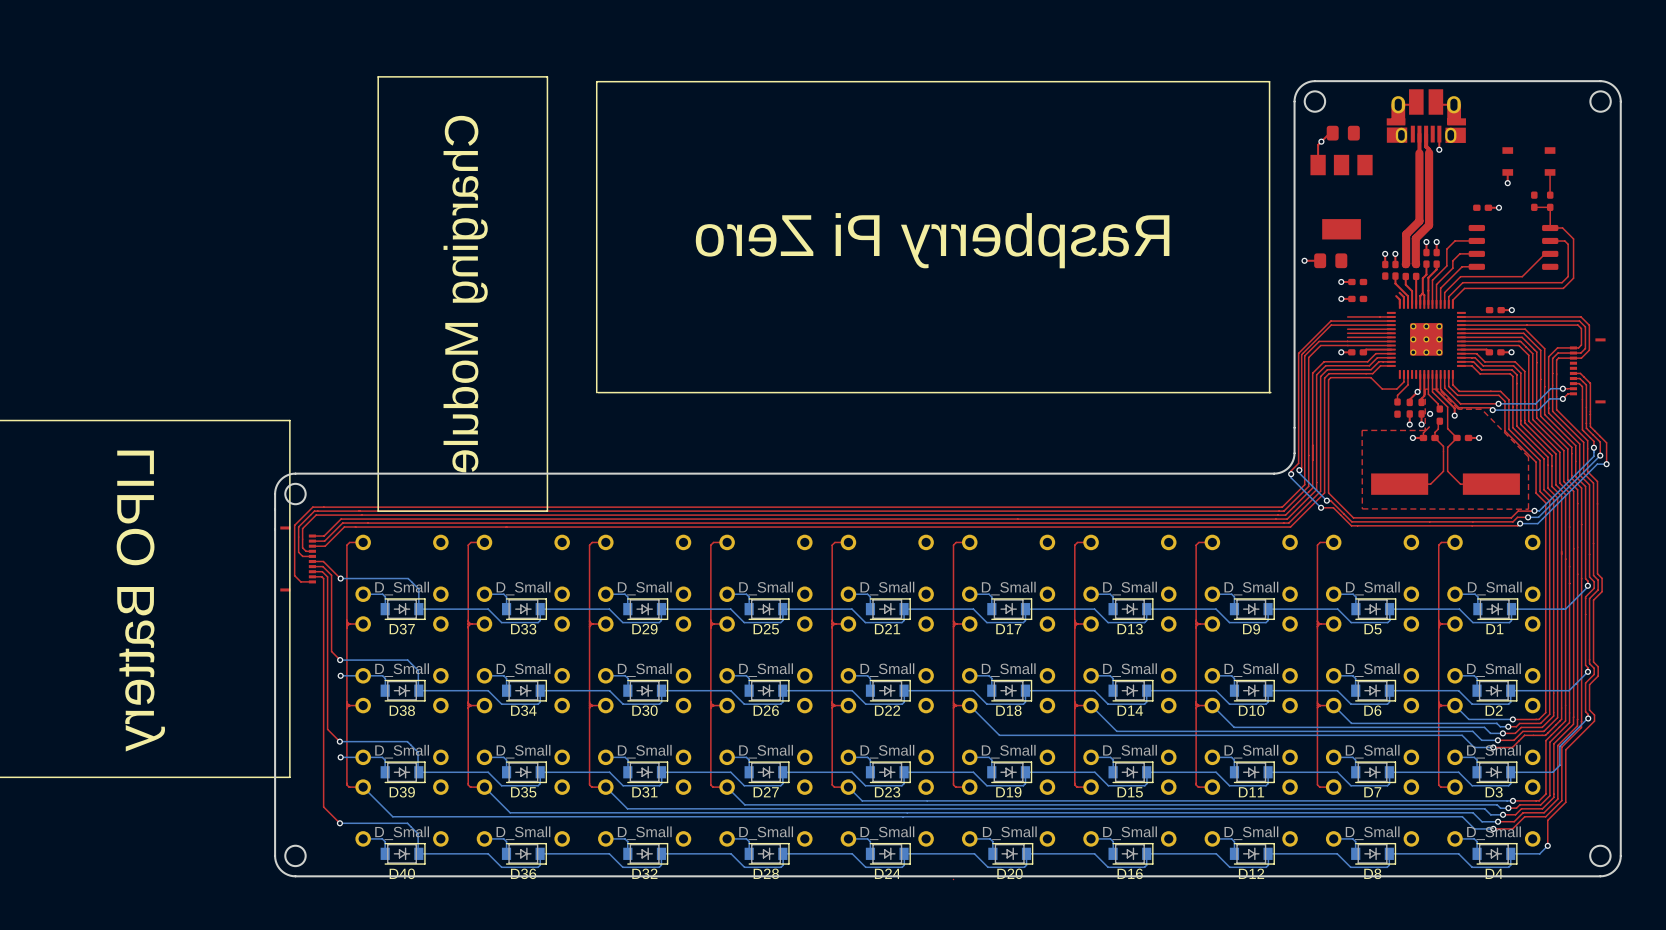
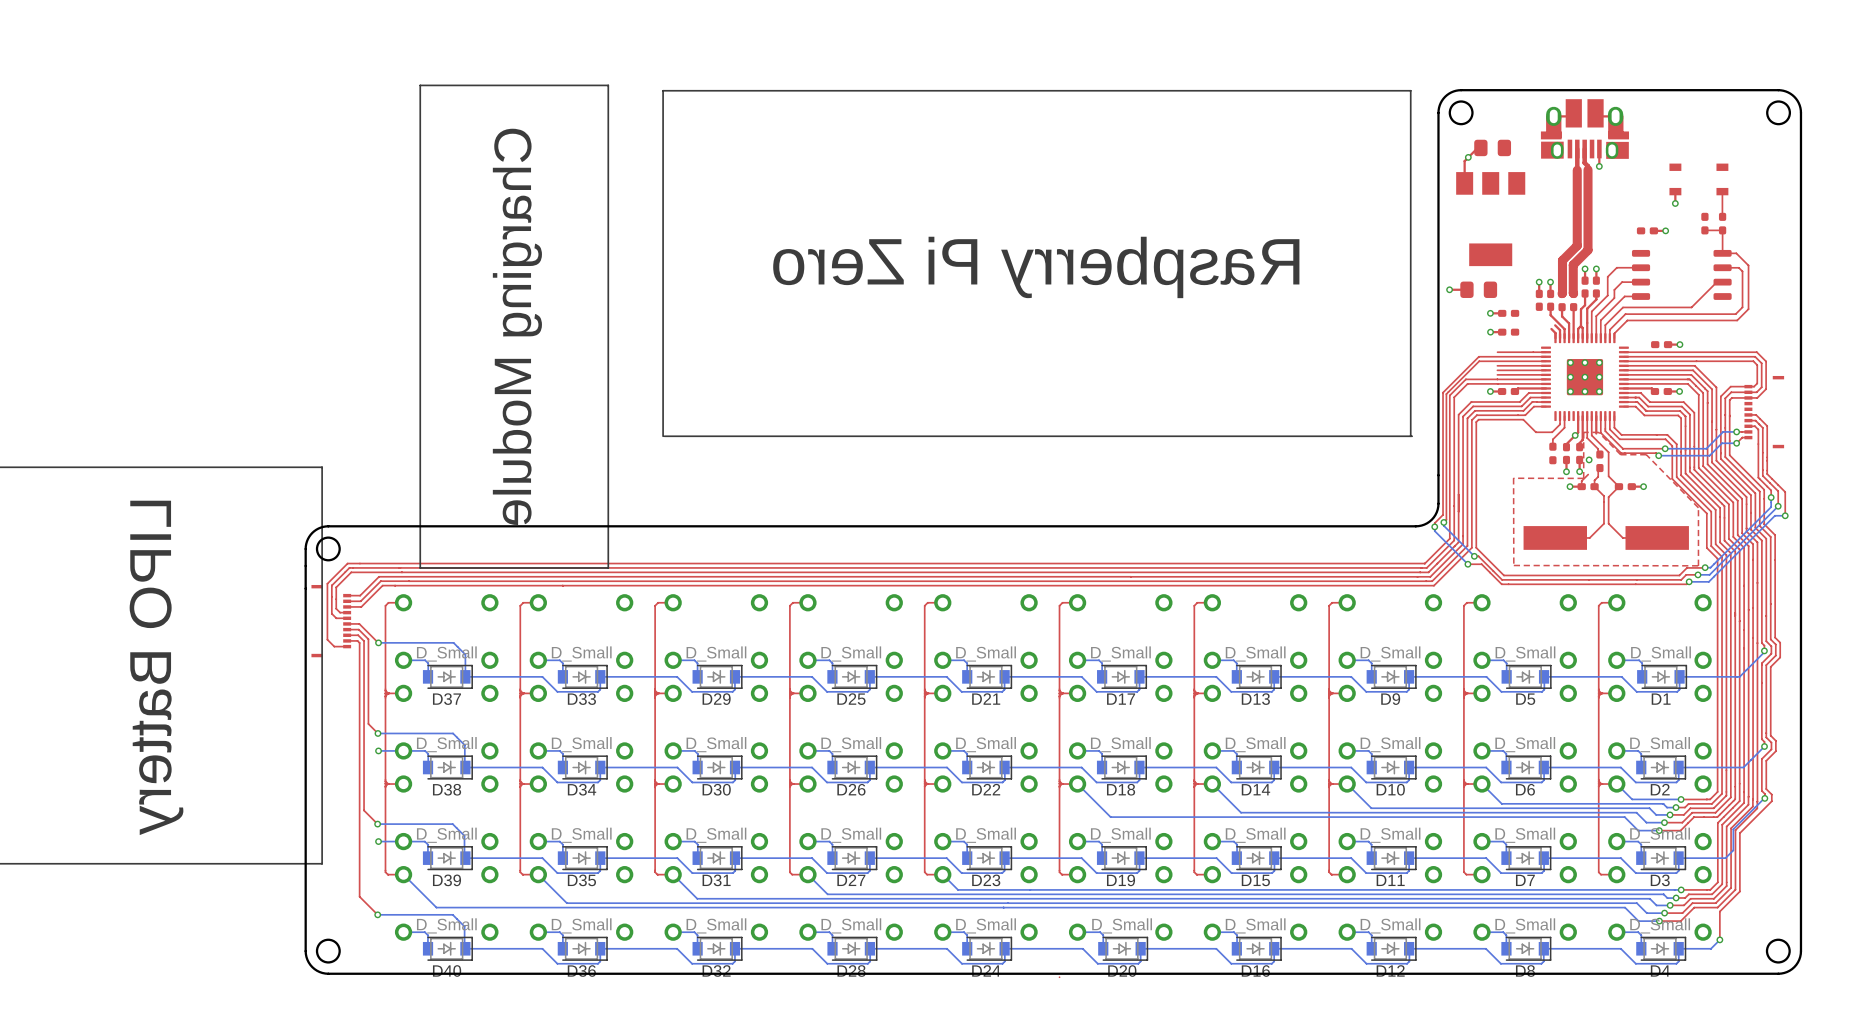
top track: (1436, 390) (1454, 408) (1454, 415) -> none
via: (1454, 415) -> none

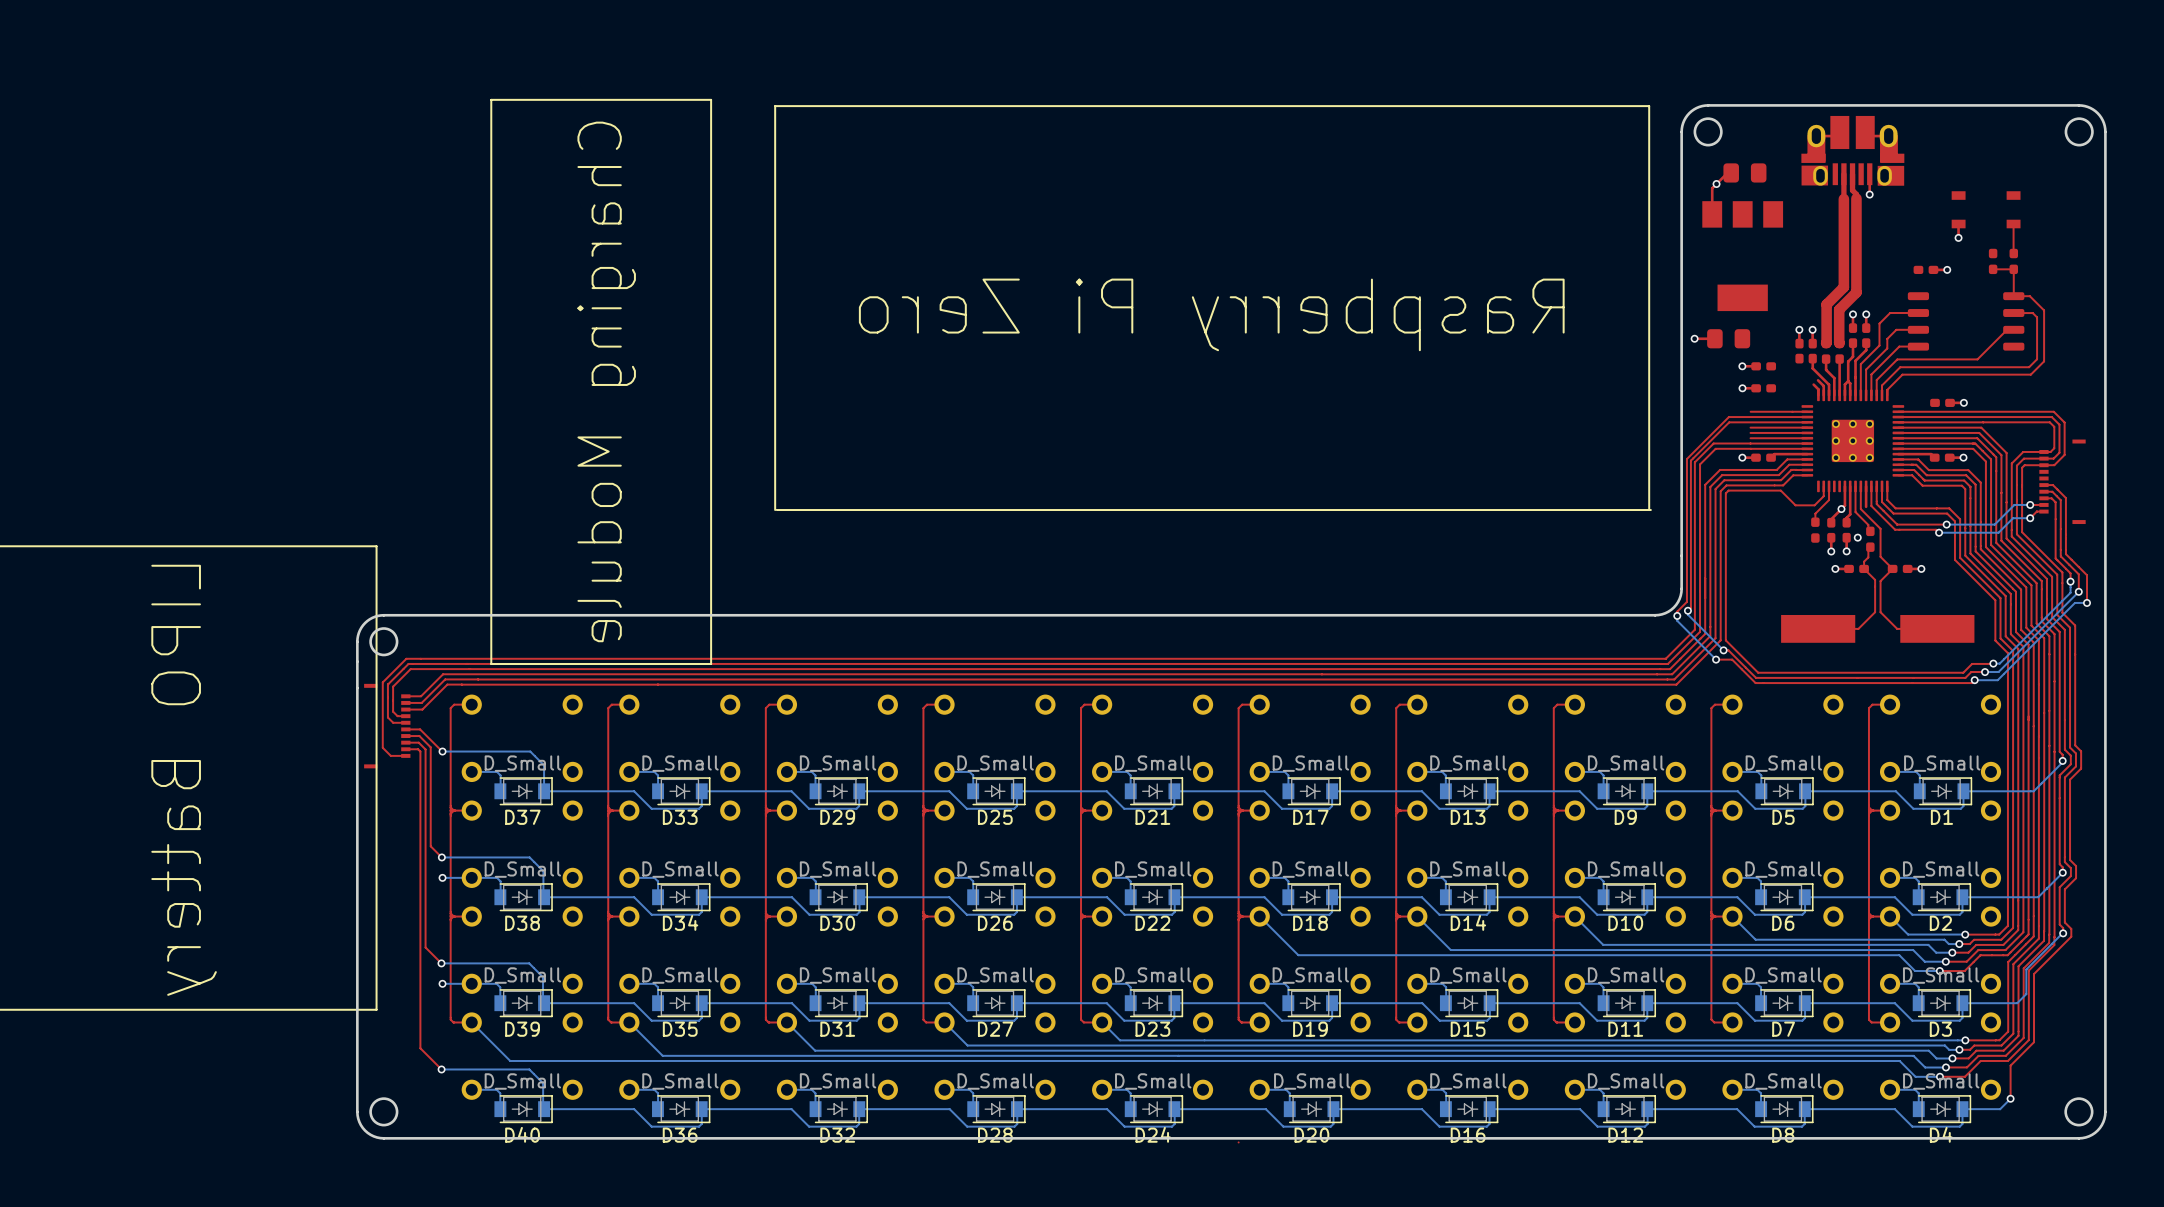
top zone outline: (1598, 432) (1620, 454) (1646, 454) (1698, 507) (1698, 565) (1513, 565) (1513, 478) (1583, 478) (1583, 432) (1598, 432) -> none
top track: (1588, 474) (1581, 481) (1581, 486) -> none

